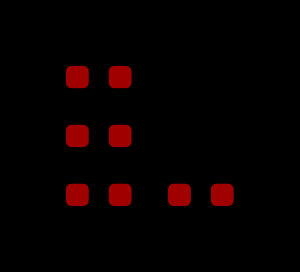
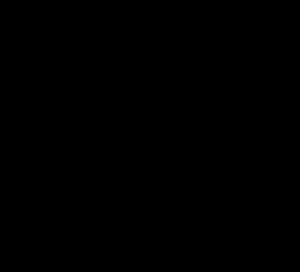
part: (98, 77) -> none
part: (98, 135) -> none
part: (98, 194) -> none
part: (200, 194) -> none

